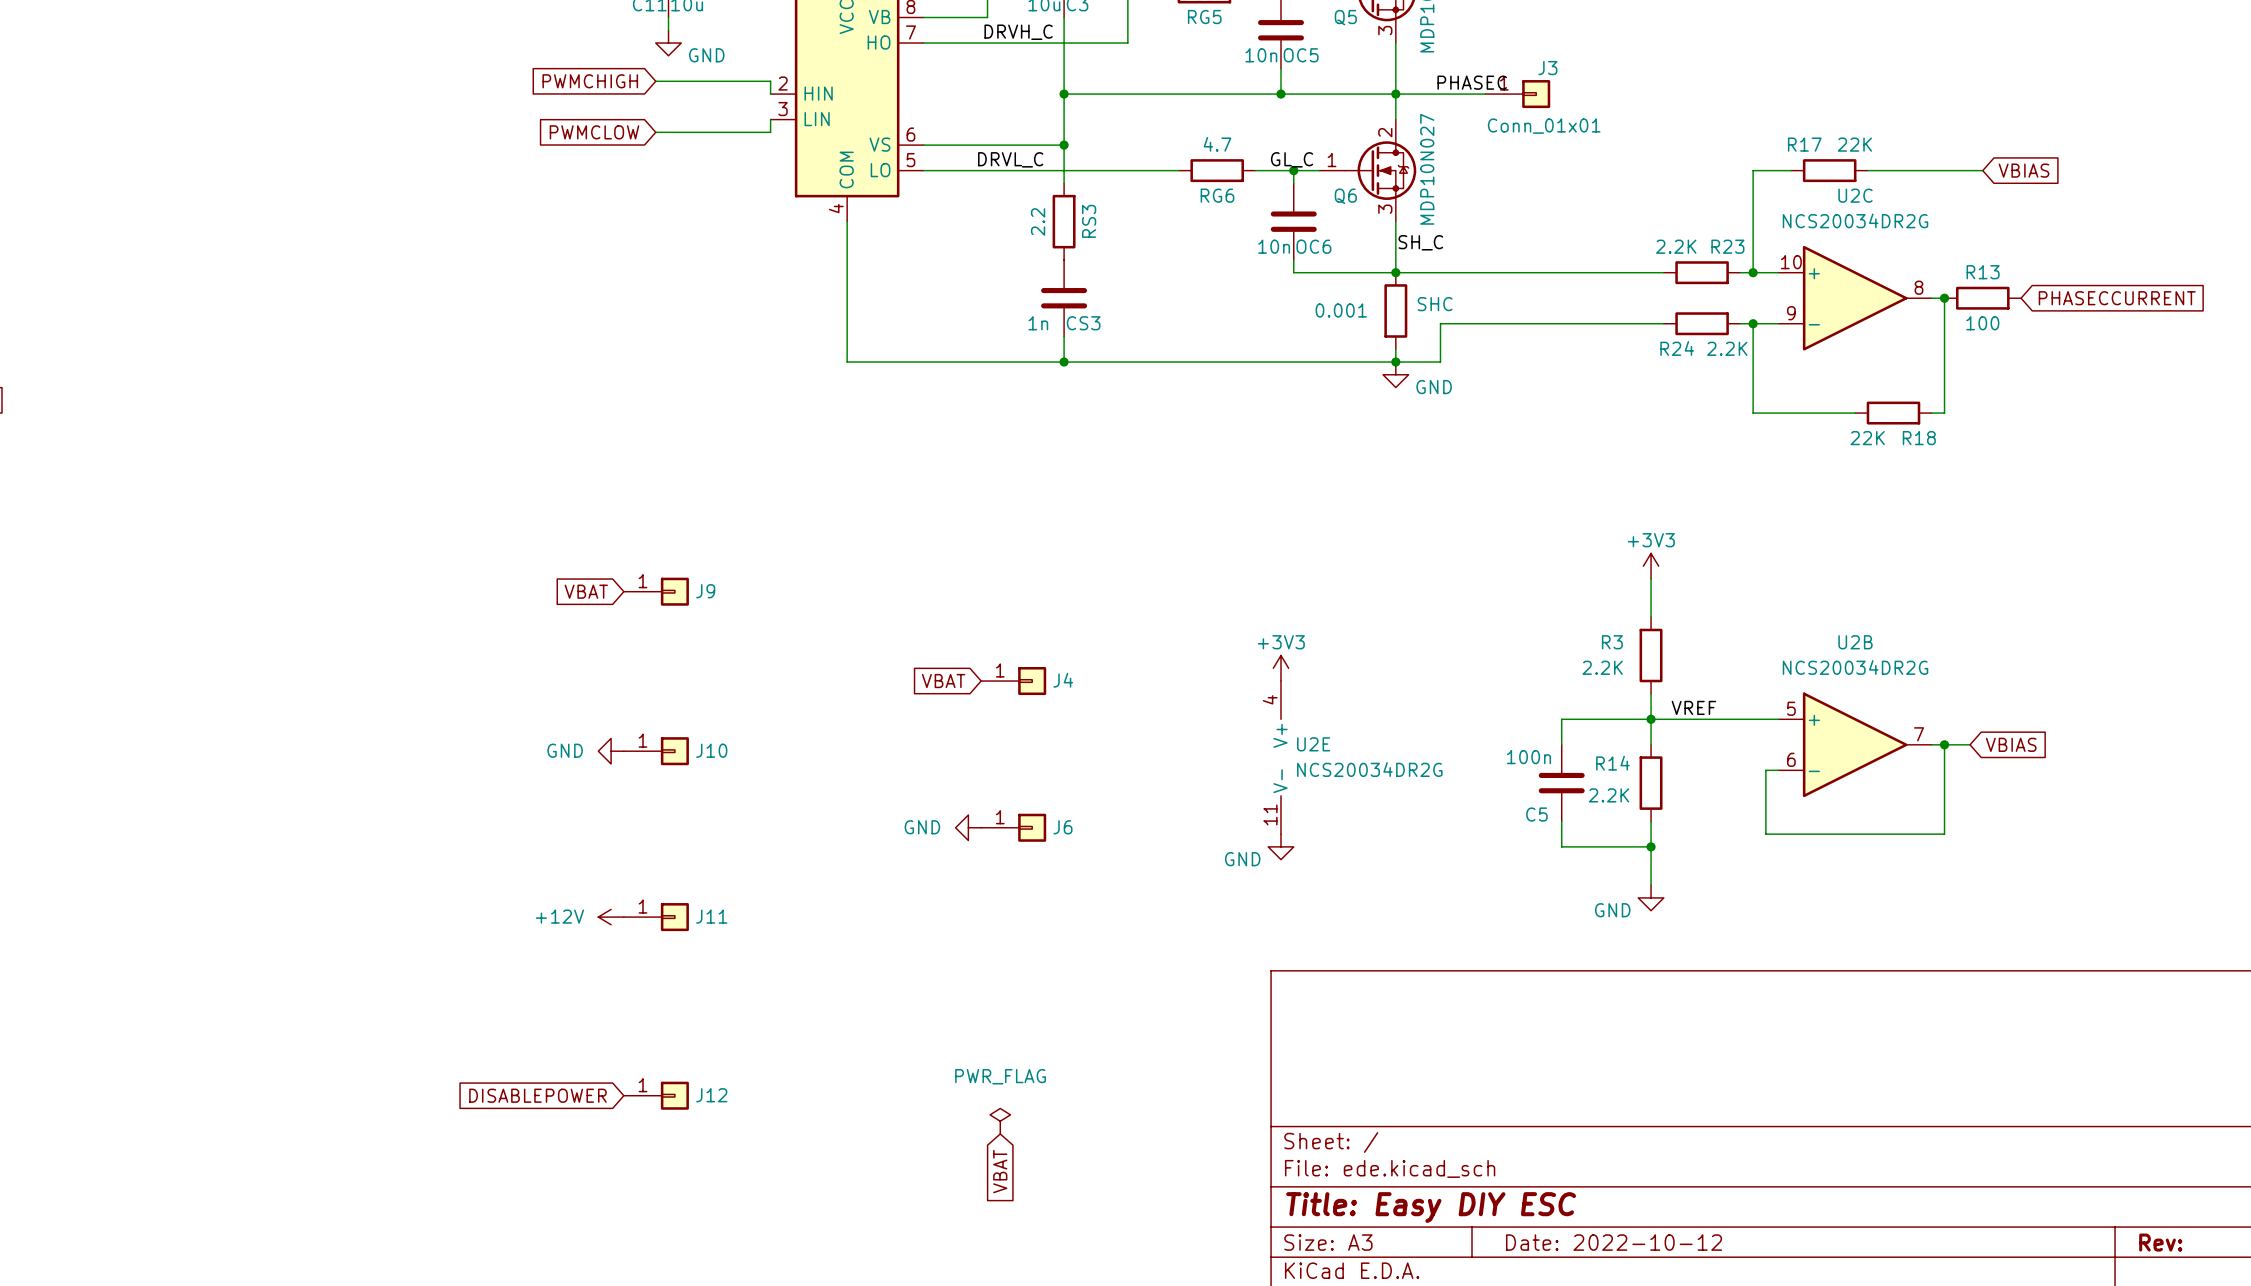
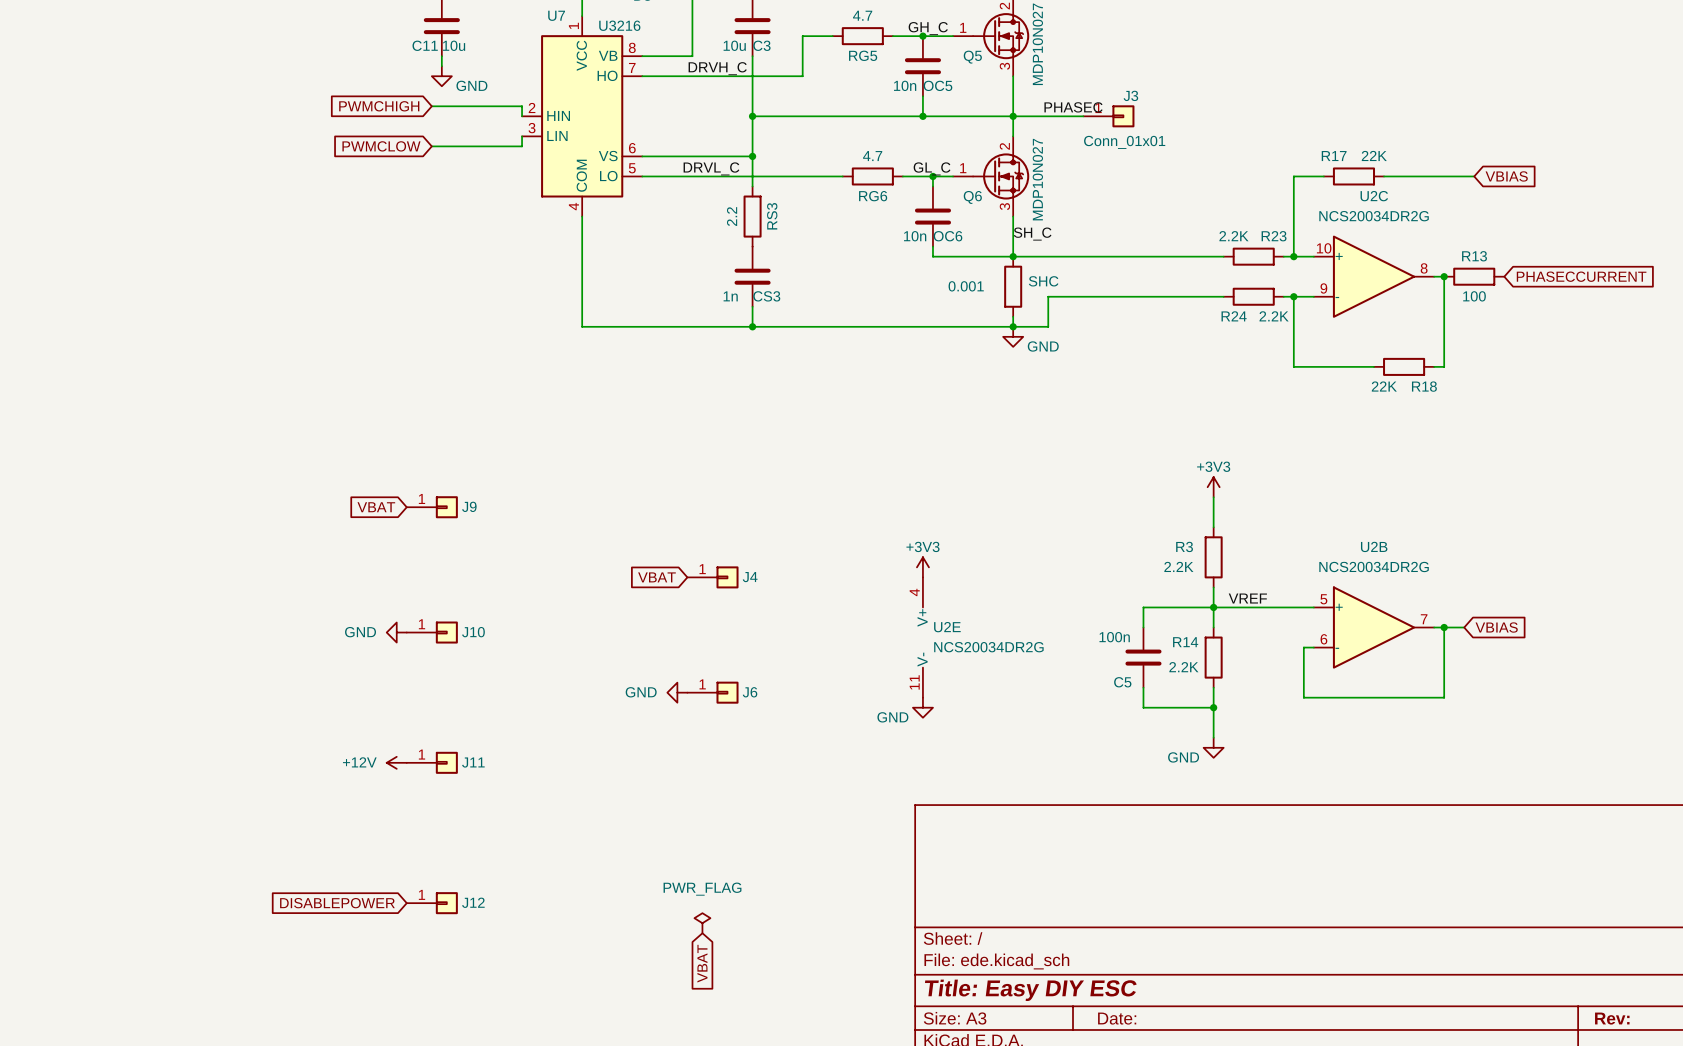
title block: Date: 2022-10-12 (1614, 1242) -> Date: (1117, 1018)

